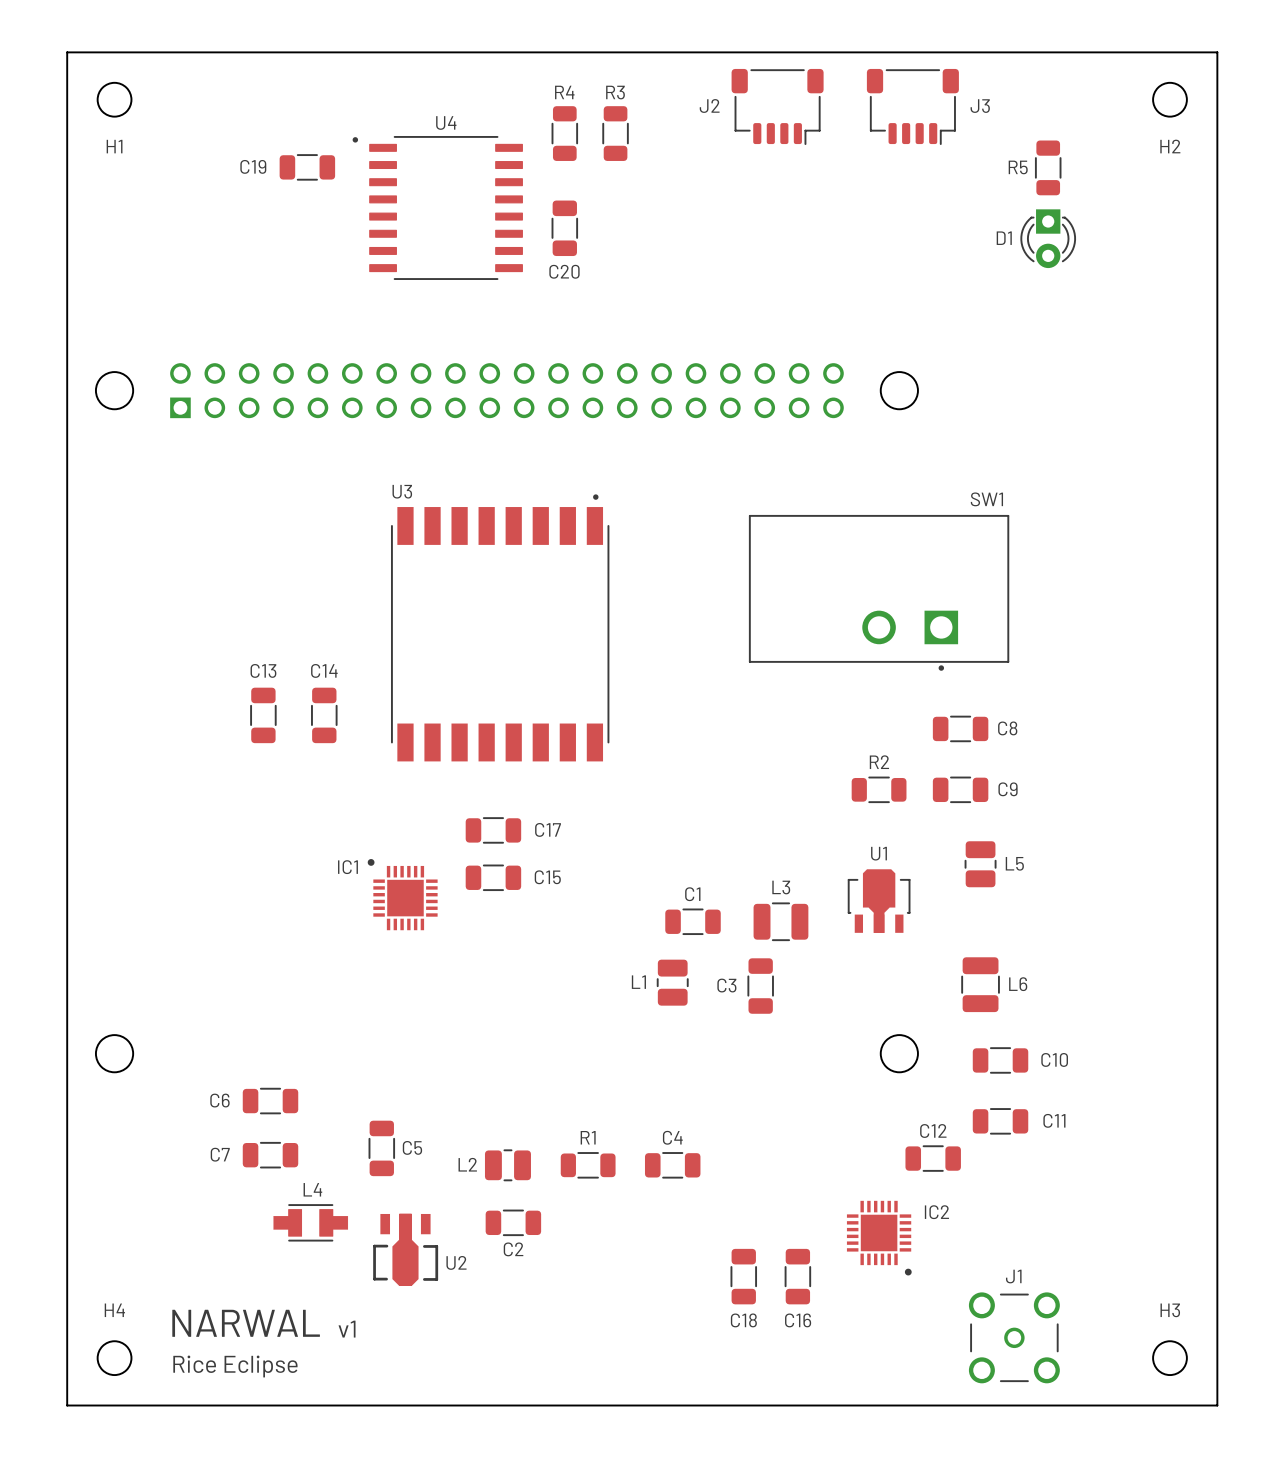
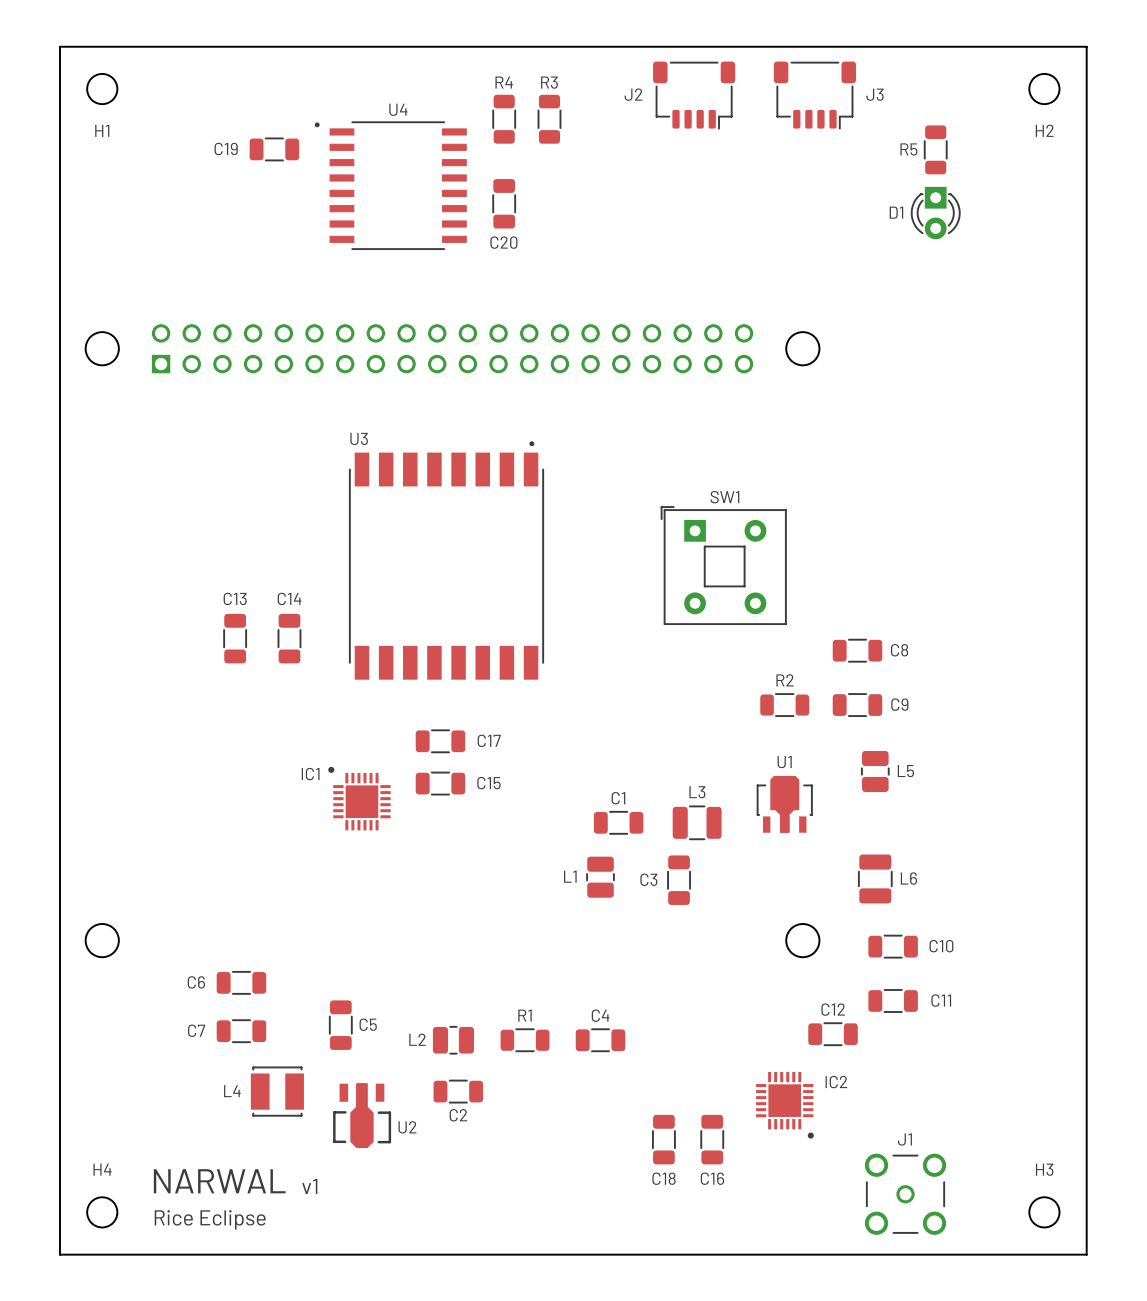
SW1 name position: SW1 (986, 499) -> SW1 (724, 497)
SW1 footprint: [748, 515, 1010, 671] -> [660, 506, 787, 625]
L4 name position: L4 (312, 1189) -> L4 (232, 1091)
L4 footprint: [273, 1204, 349, 1242] -> [250, 1066, 304, 1117]

